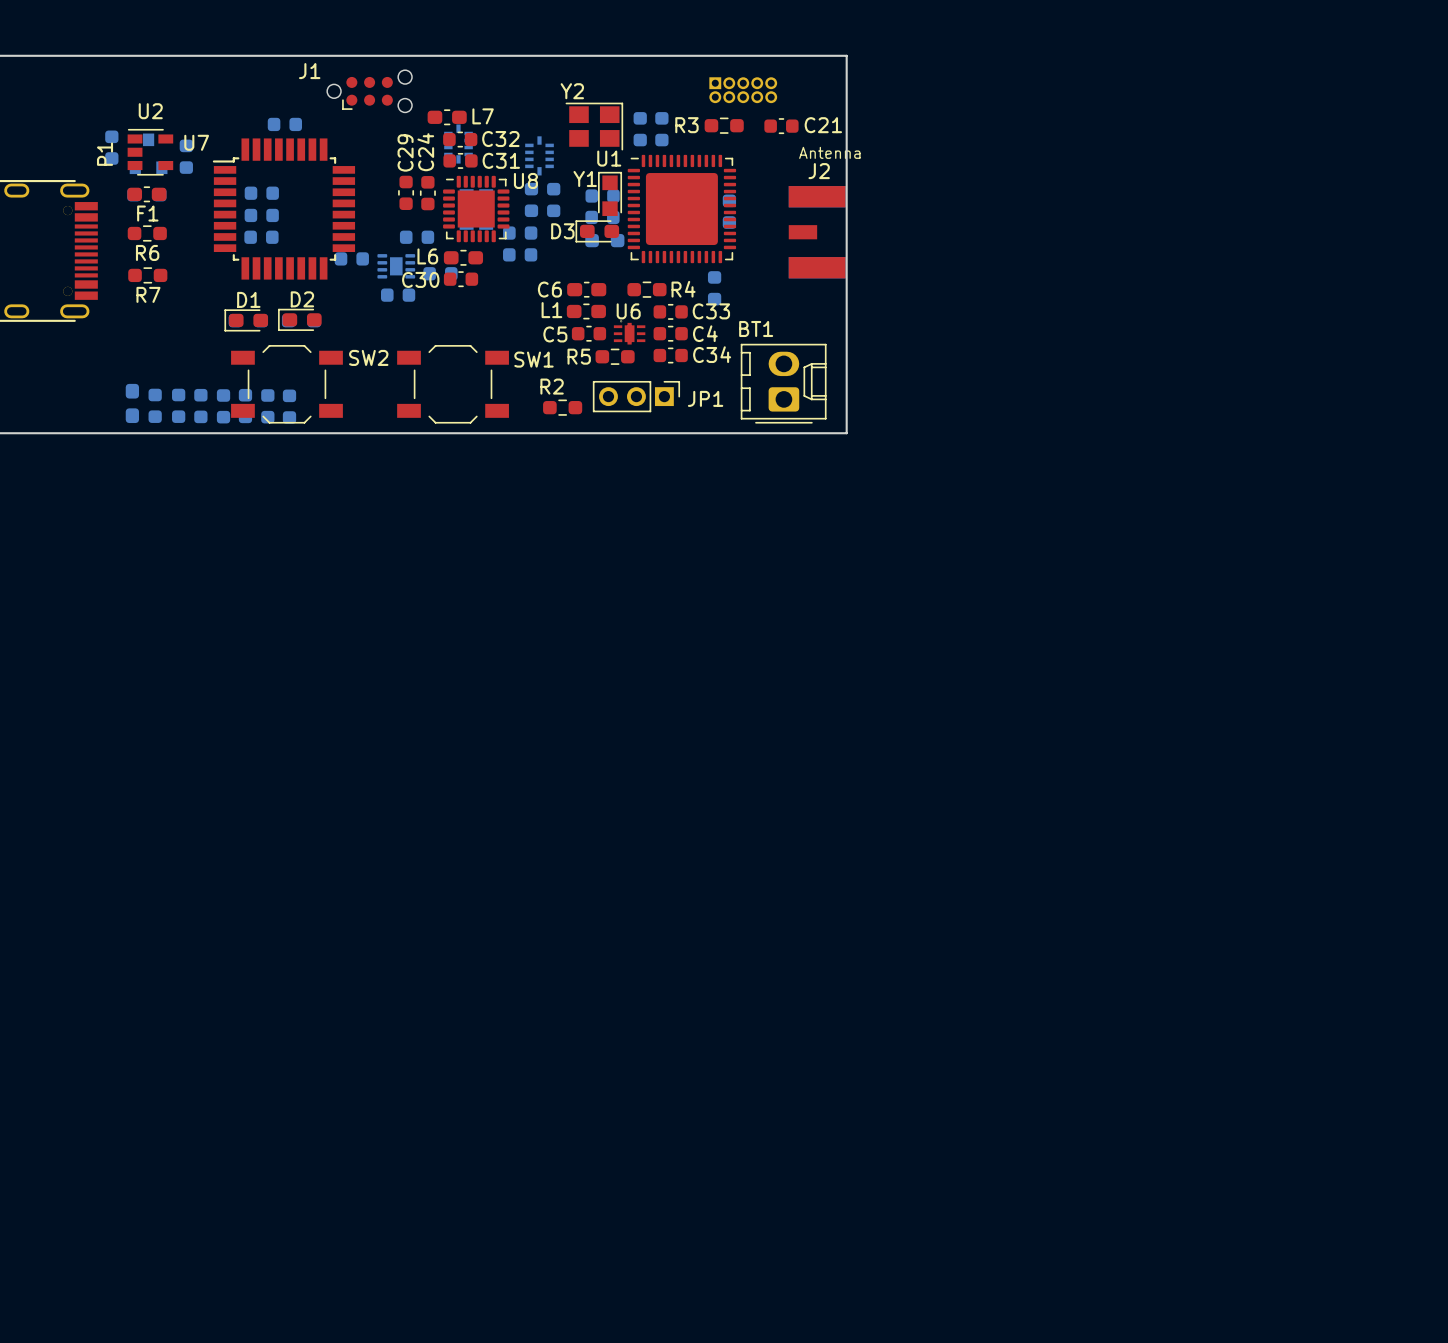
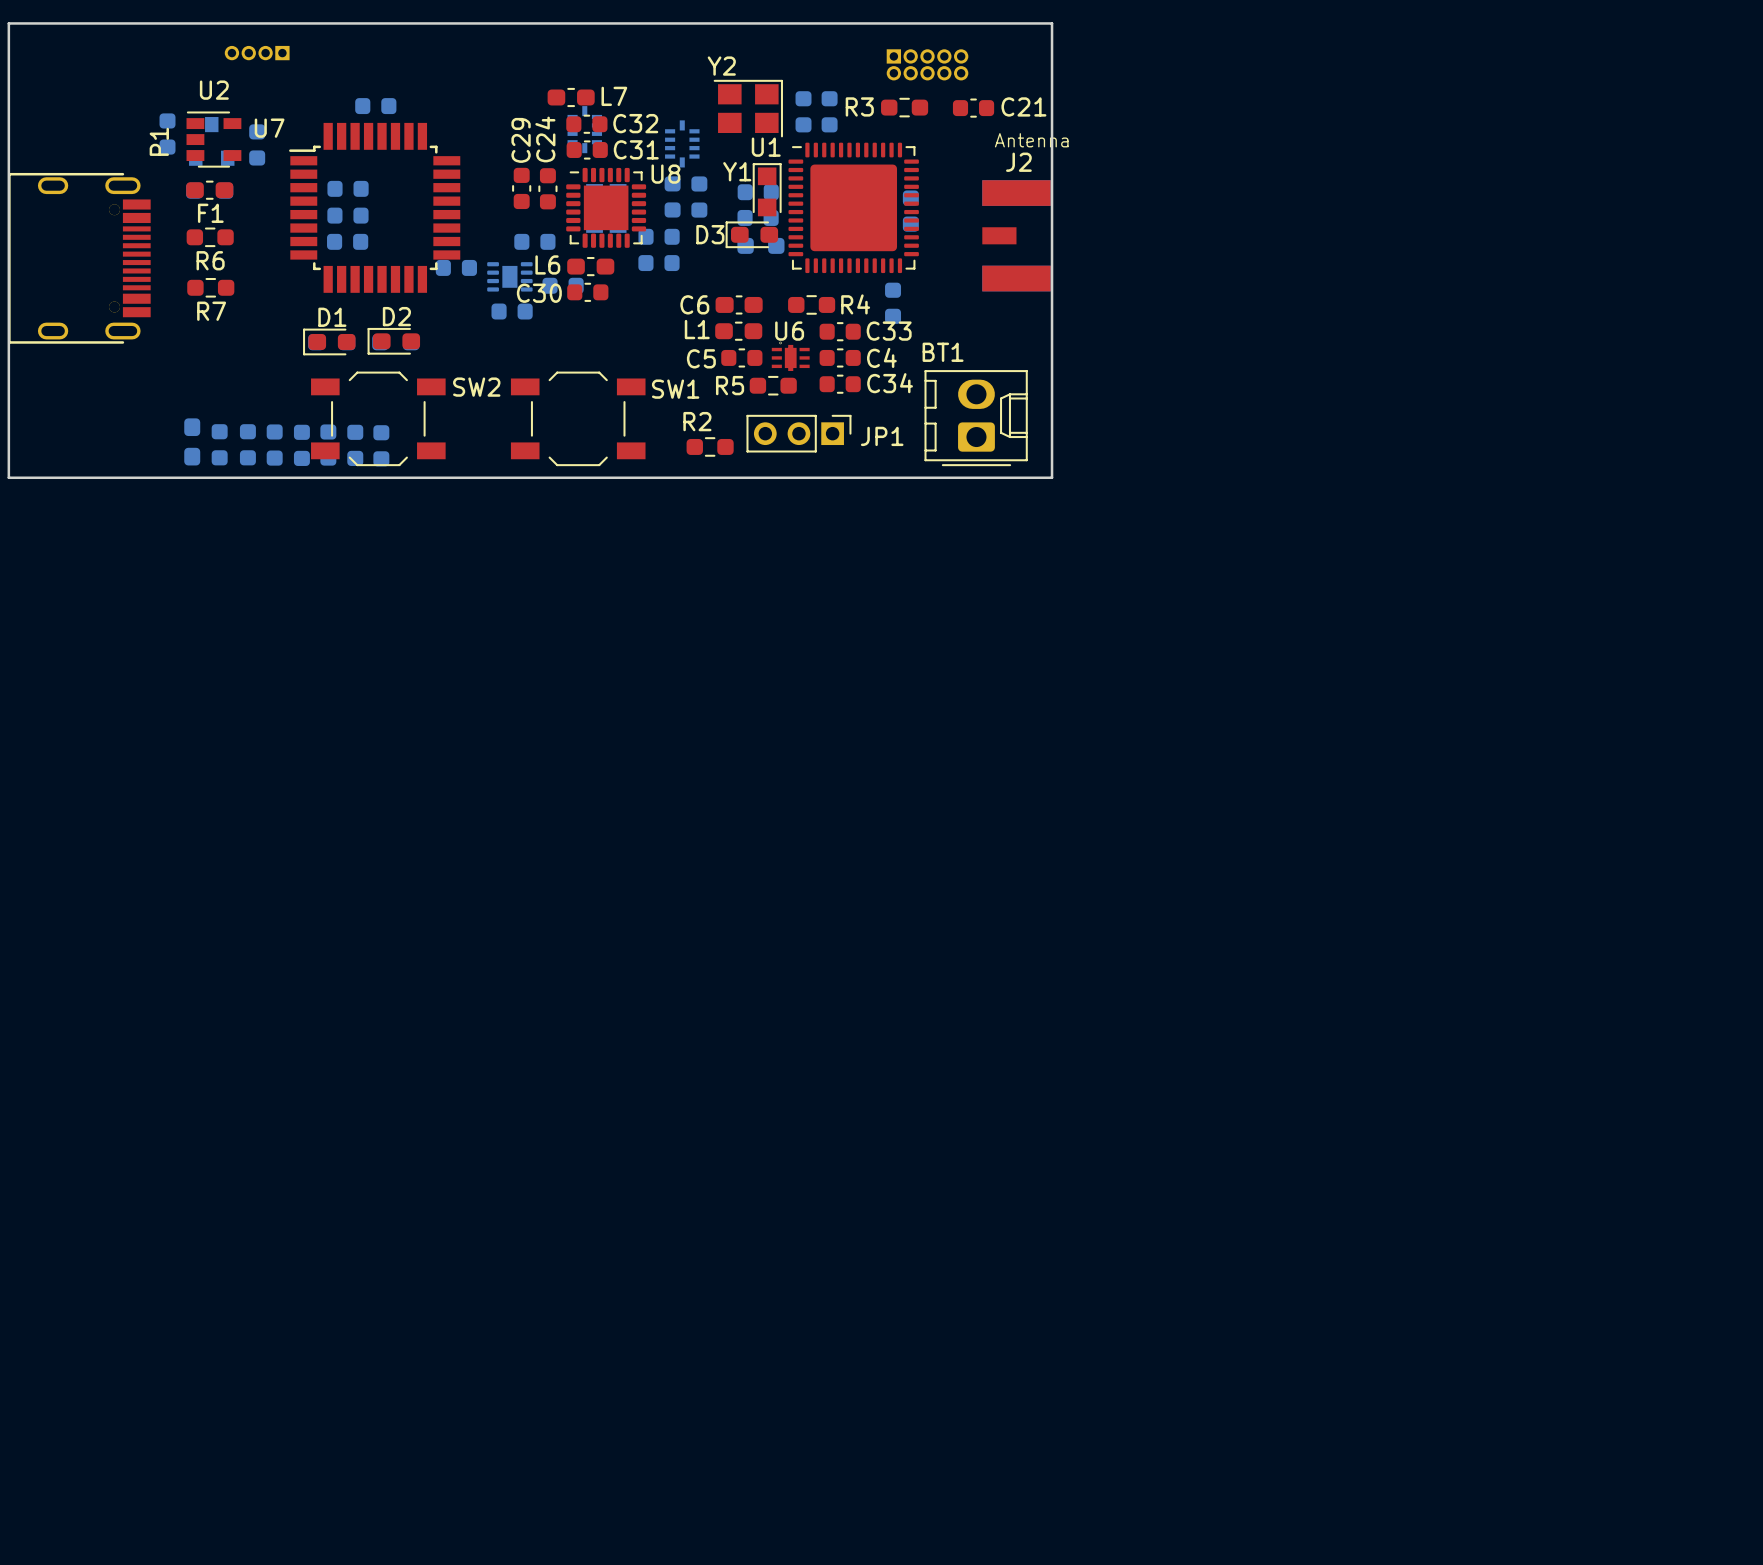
part: none -> (257, 53)
J1: (369, 91) -> none

